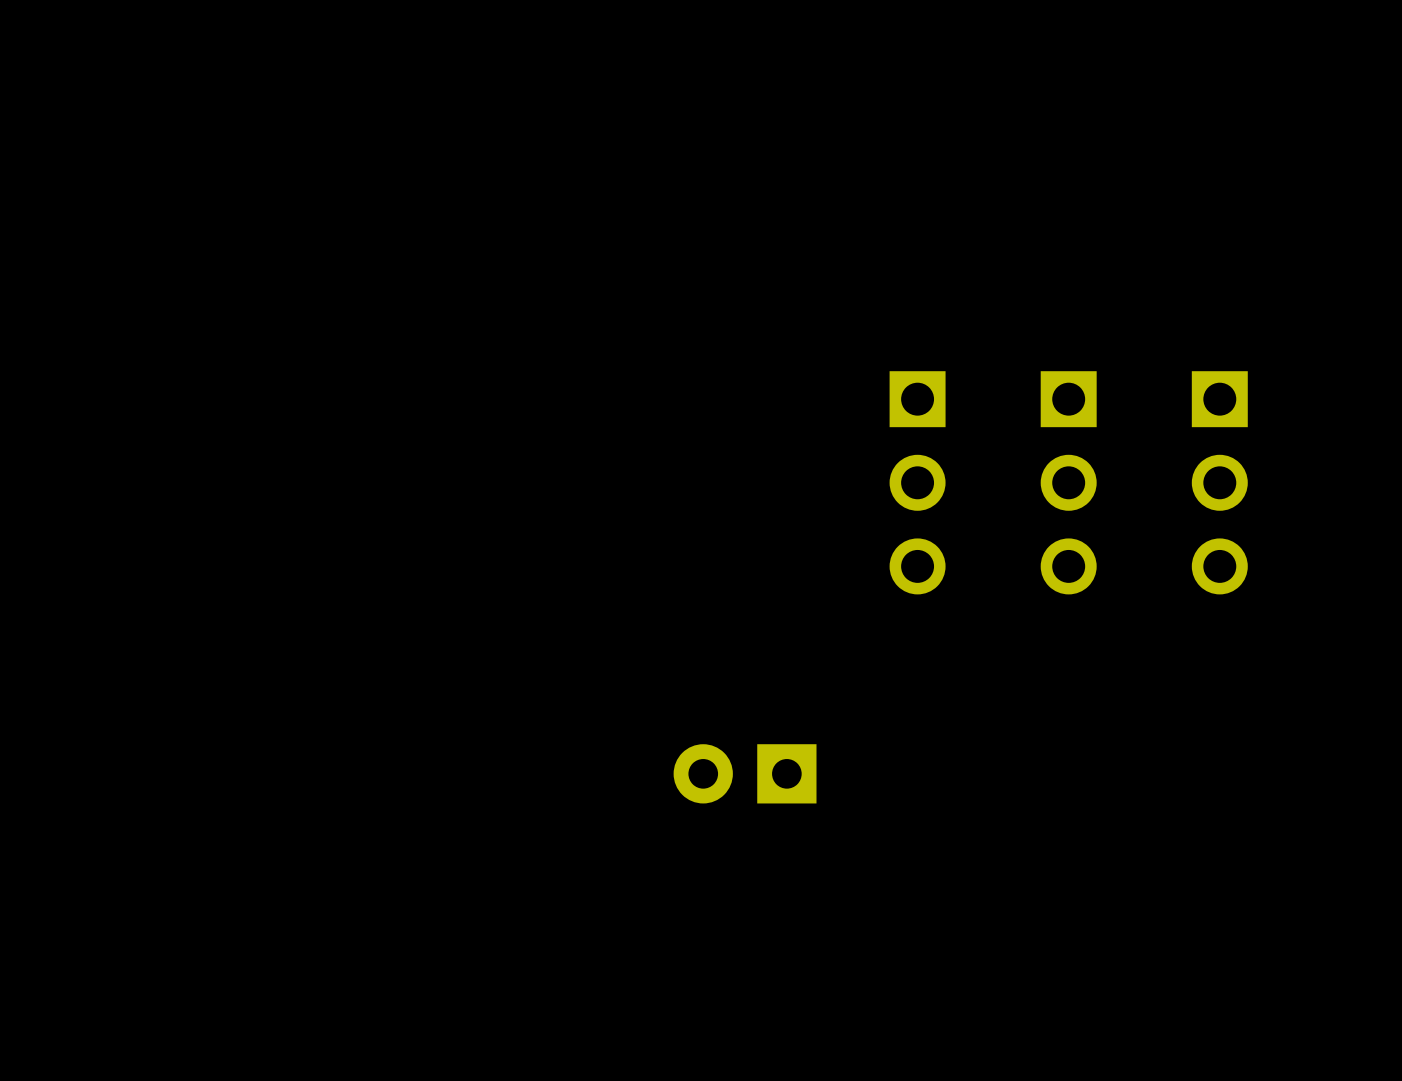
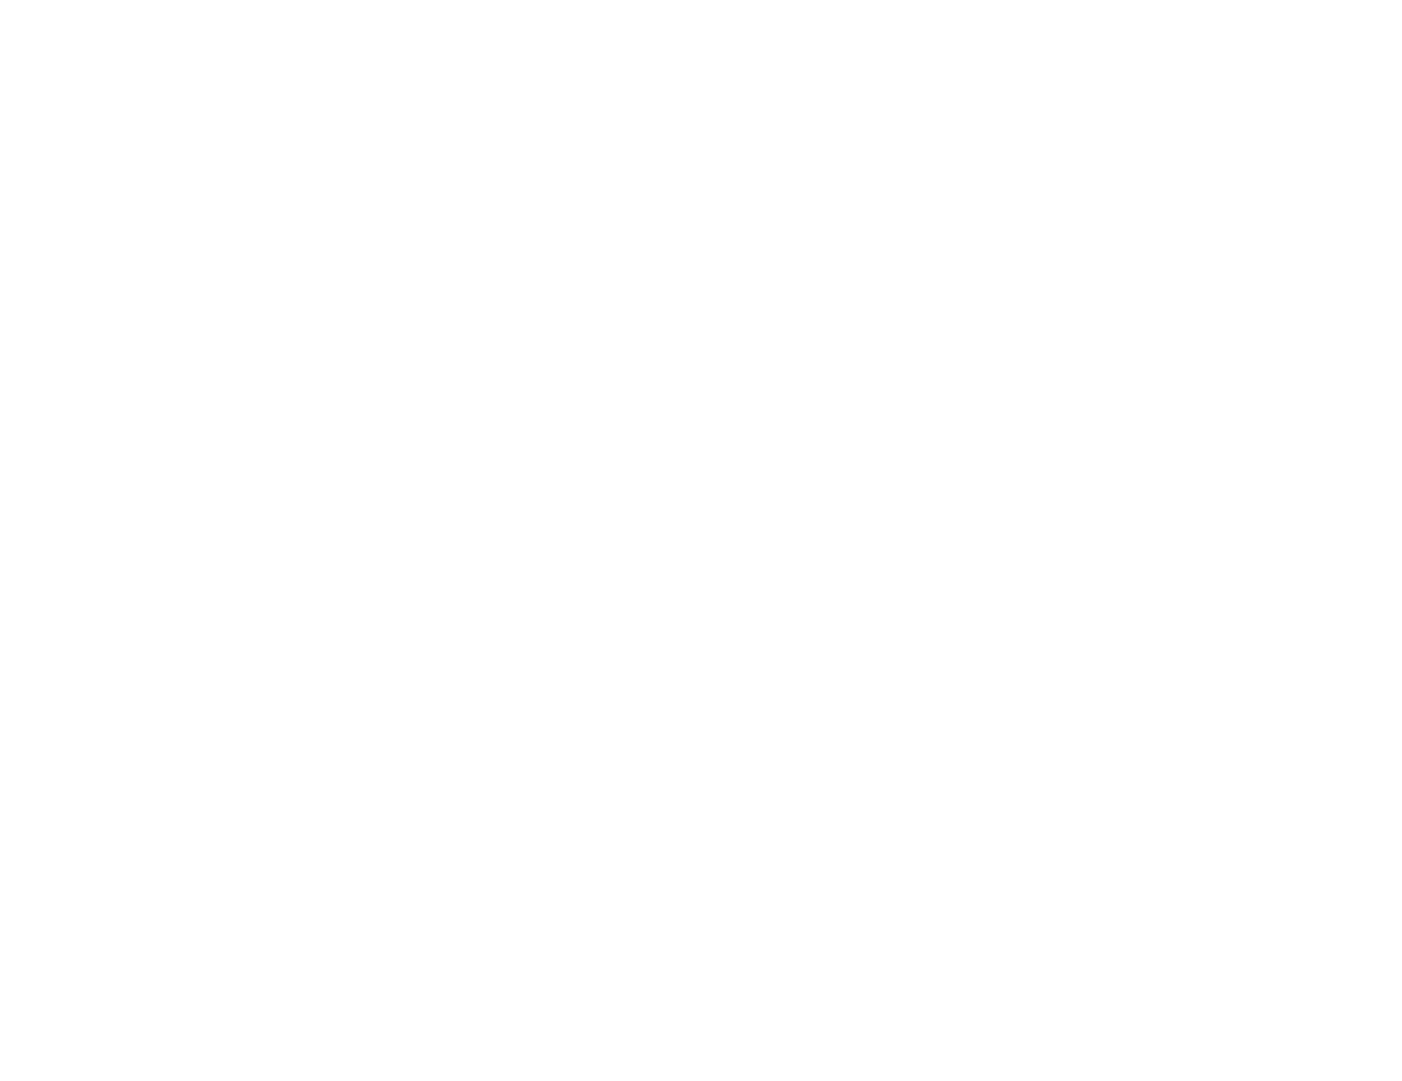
part: (917, 482) -> none
part: (1068, 482) -> none
part: (1219, 482) -> none
part: (745, 773) -> none

